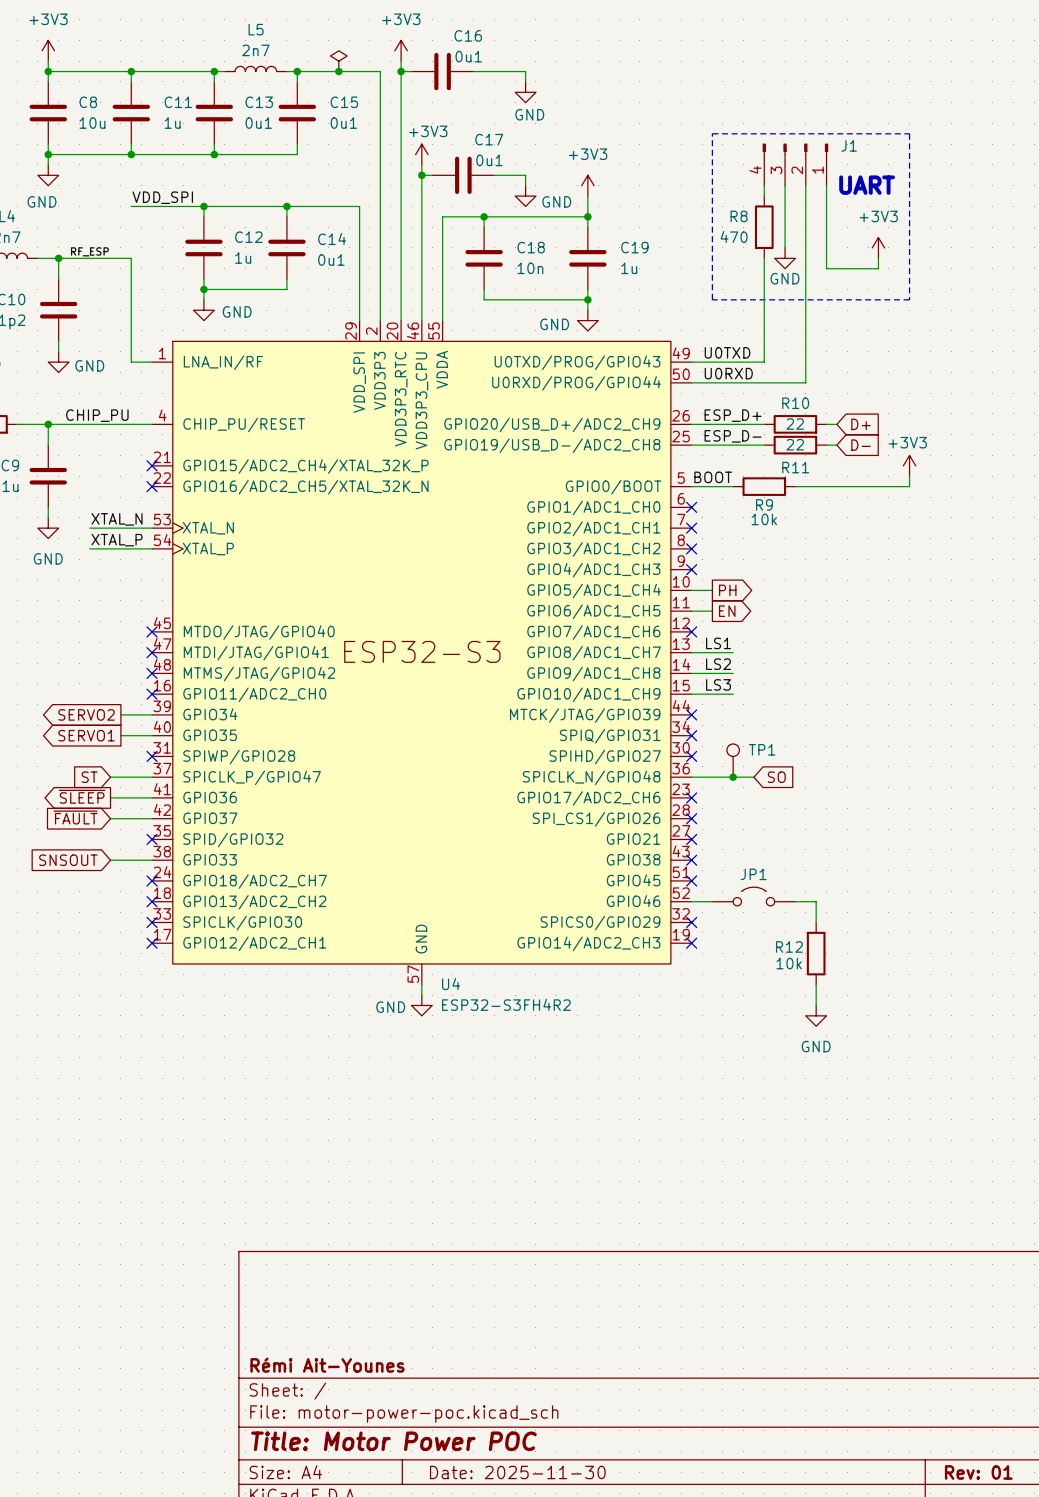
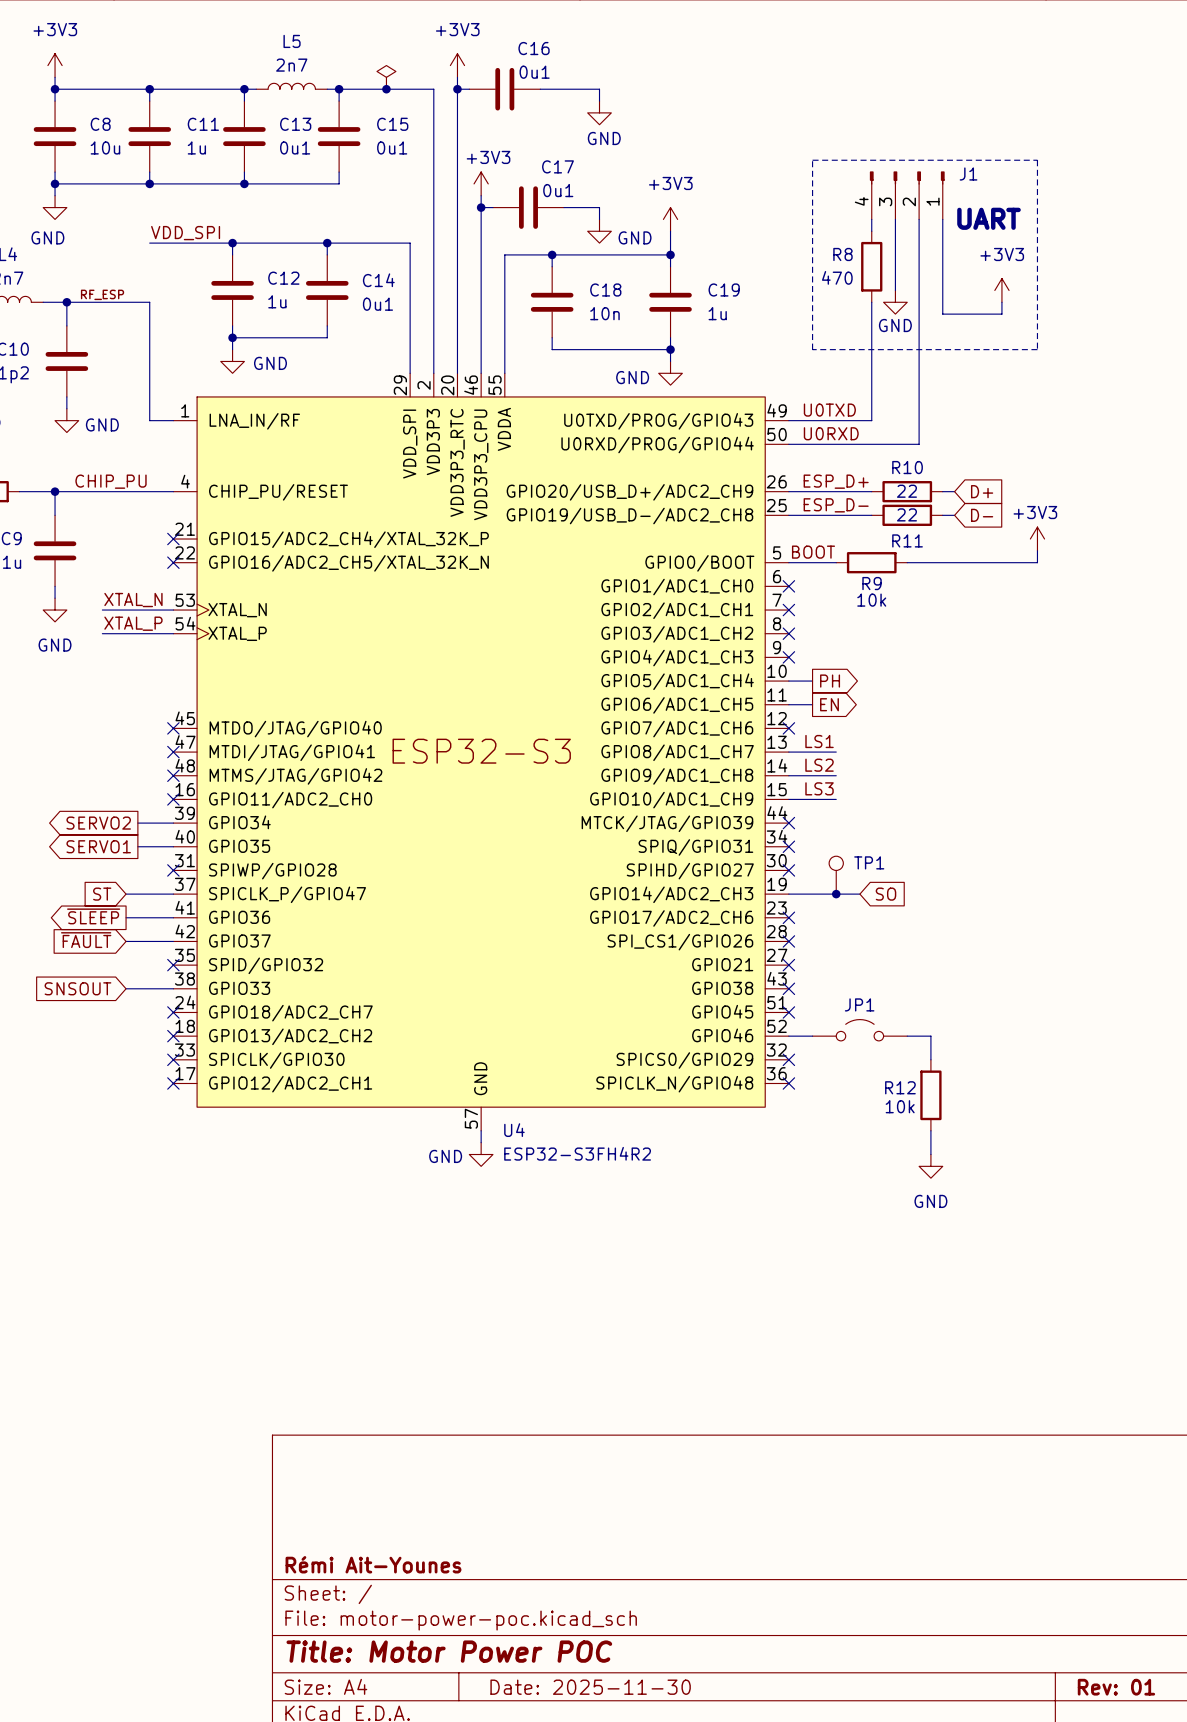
U4 pin number: 36 (681, 768) -> 19 (777, 884)
U4 pin name: SPICLK_N/GPIO48 (591, 777) -> GPIO14/ADC2_CH3 (671, 894)
U4 pin number: 19 (681, 934) -> 36 (776, 1073)
U4 pin name: GPIO14/ADC2_CH3 (588, 943) -> SPICLK_N/GPIO48 (674, 1084)

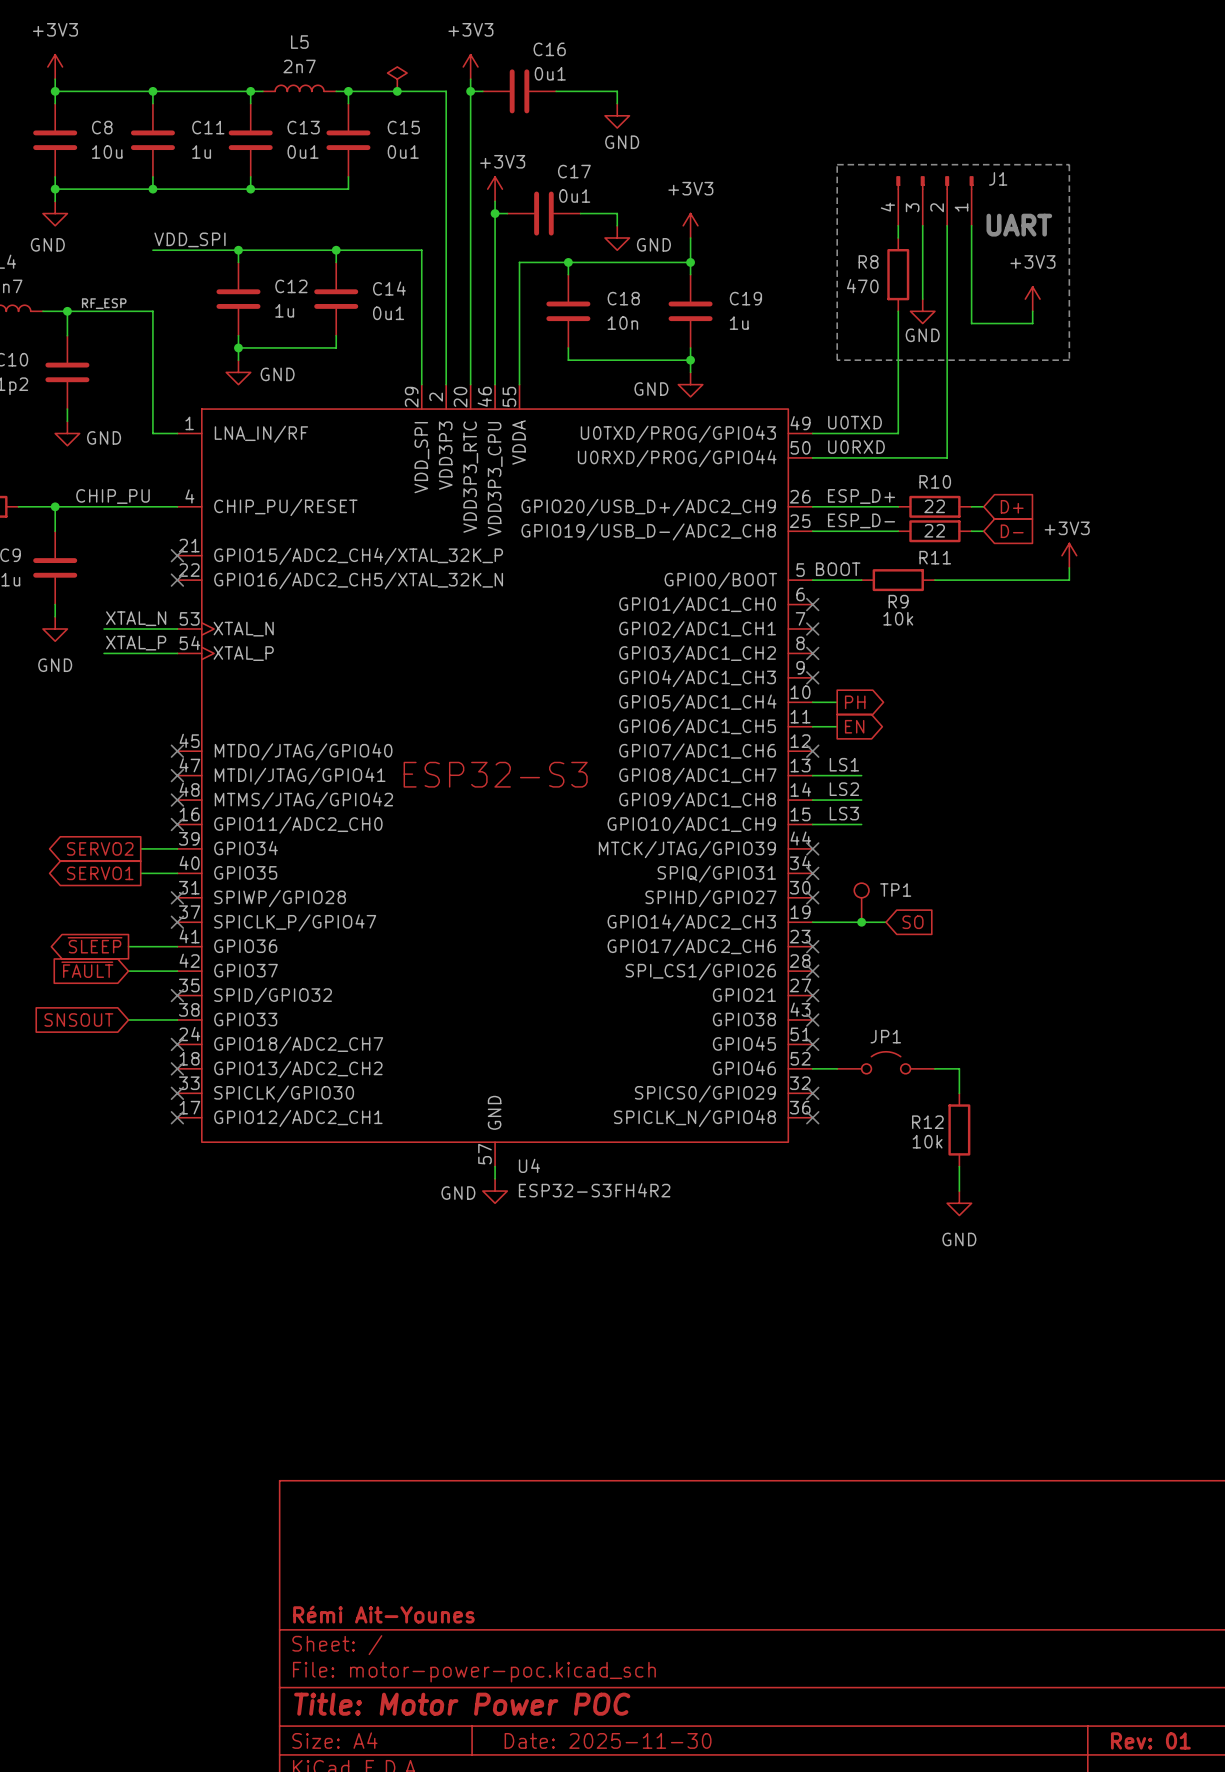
global label: ST (102, 894) -> none
wire: (126, 894) (173, 894) -> none
no-connect mark: none -> (177, 922)

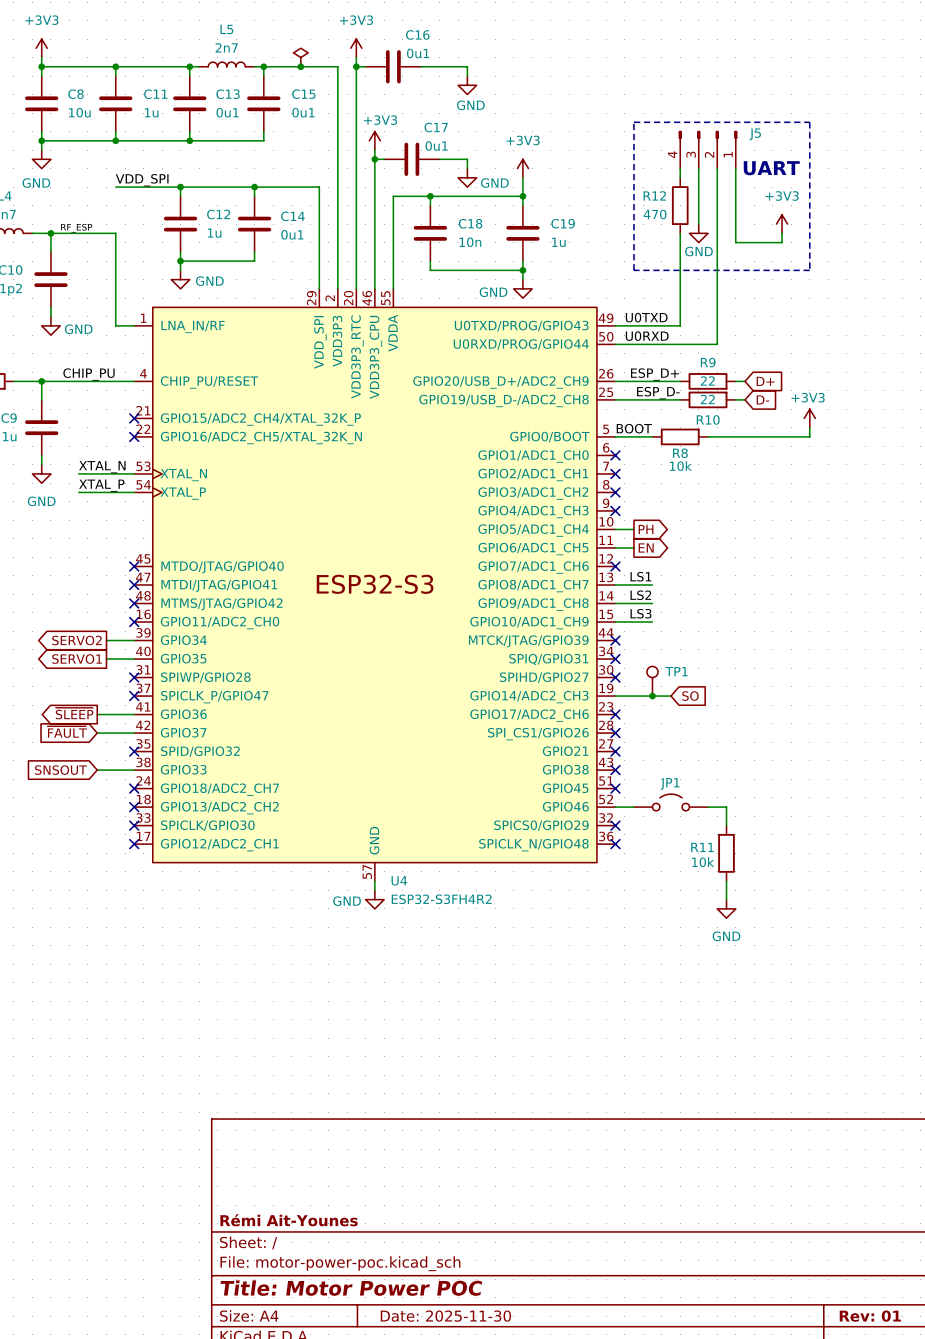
J1 name: J1 (998, 178) -> J5 (755, 134)
R8 name: R8 (868, 261) -> R12 (654, 195)
R10 name: R10 (935, 481) -> R9 (708, 362)
R11 name: R11 (935, 557) -> R10 (708, 419)
R9 name: R9 (898, 601) -> R8 (680, 453)
R12 name: R12 (927, 1122) -> R11 (702, 847)

